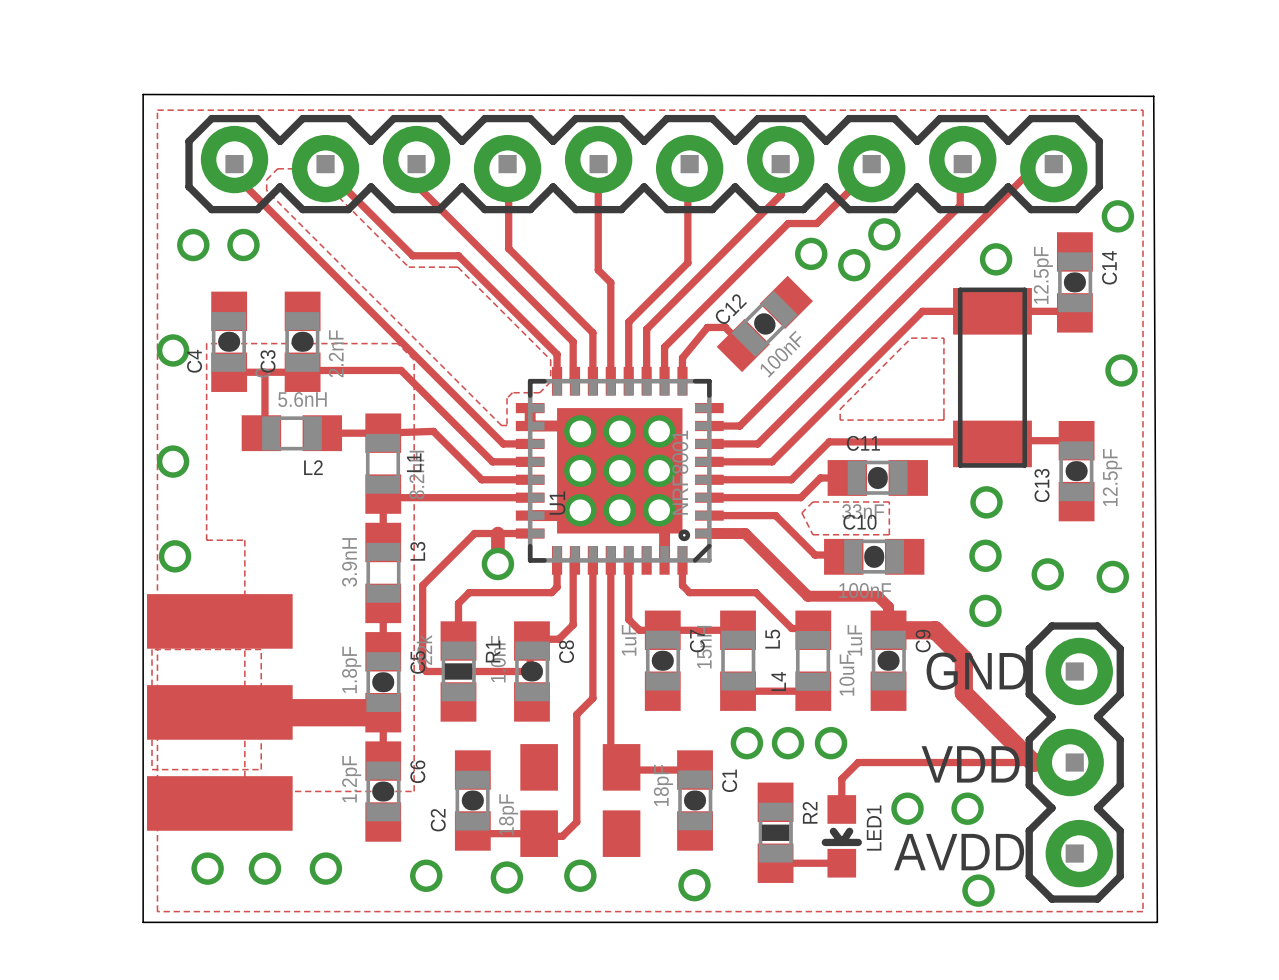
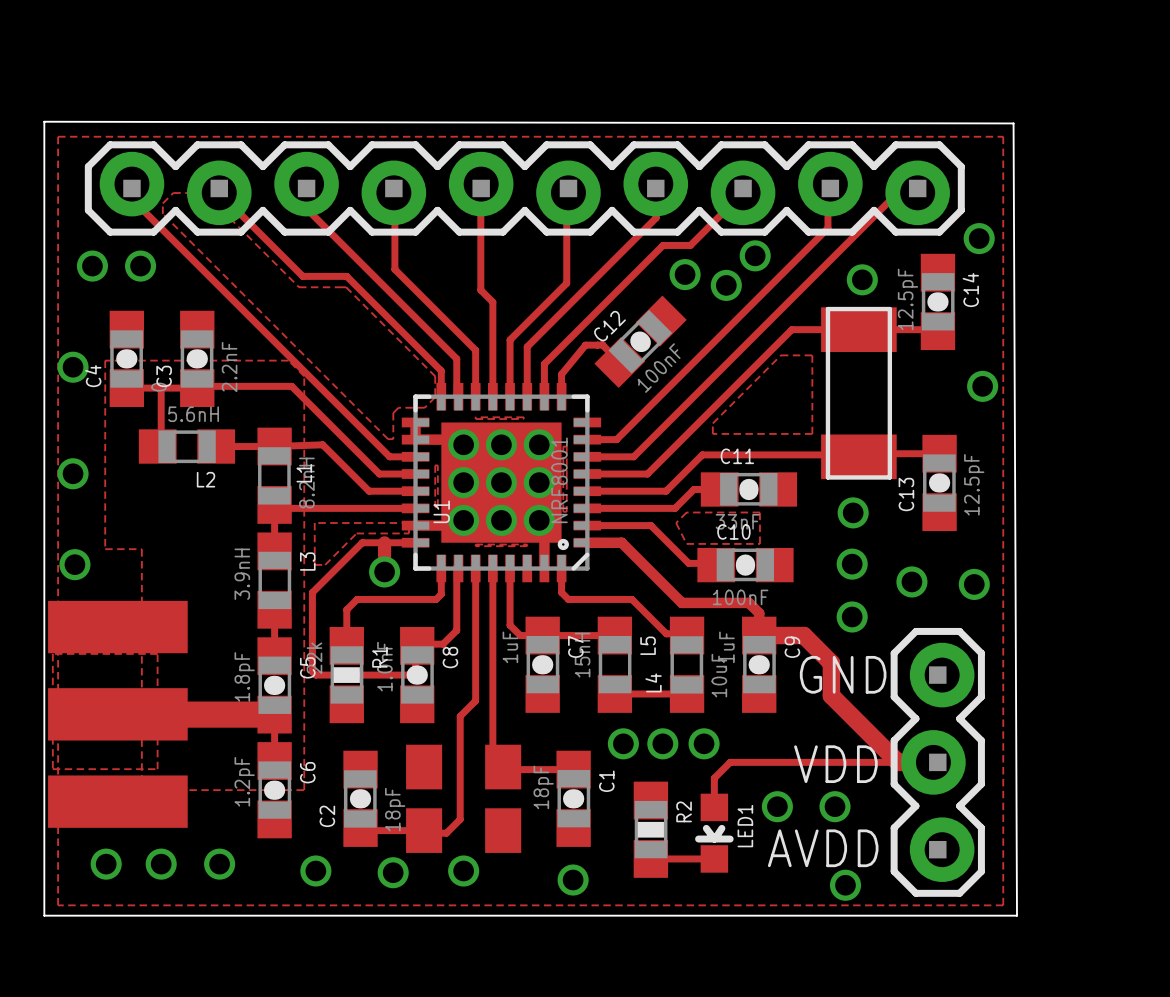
zone outline: none -> (475, 417) (523, 417) (523, 419) (475, 419) (475, 417)
zone outline: none -> (563, 446) (563, 511) (566, 511) (566, 446) (563, 446)
zone outline: none -> (435, 465) (435, 507) (437, 507) (437, 465) (435, 465)
zone outline: none -> (314, 522) (314, 564) (325, 564) (356, 533) (409, 533) (409, 522) (314, 522)
zone outline: none -> (475, 544) (475, 546) (527, 546) (527, 544) (475, 544)

